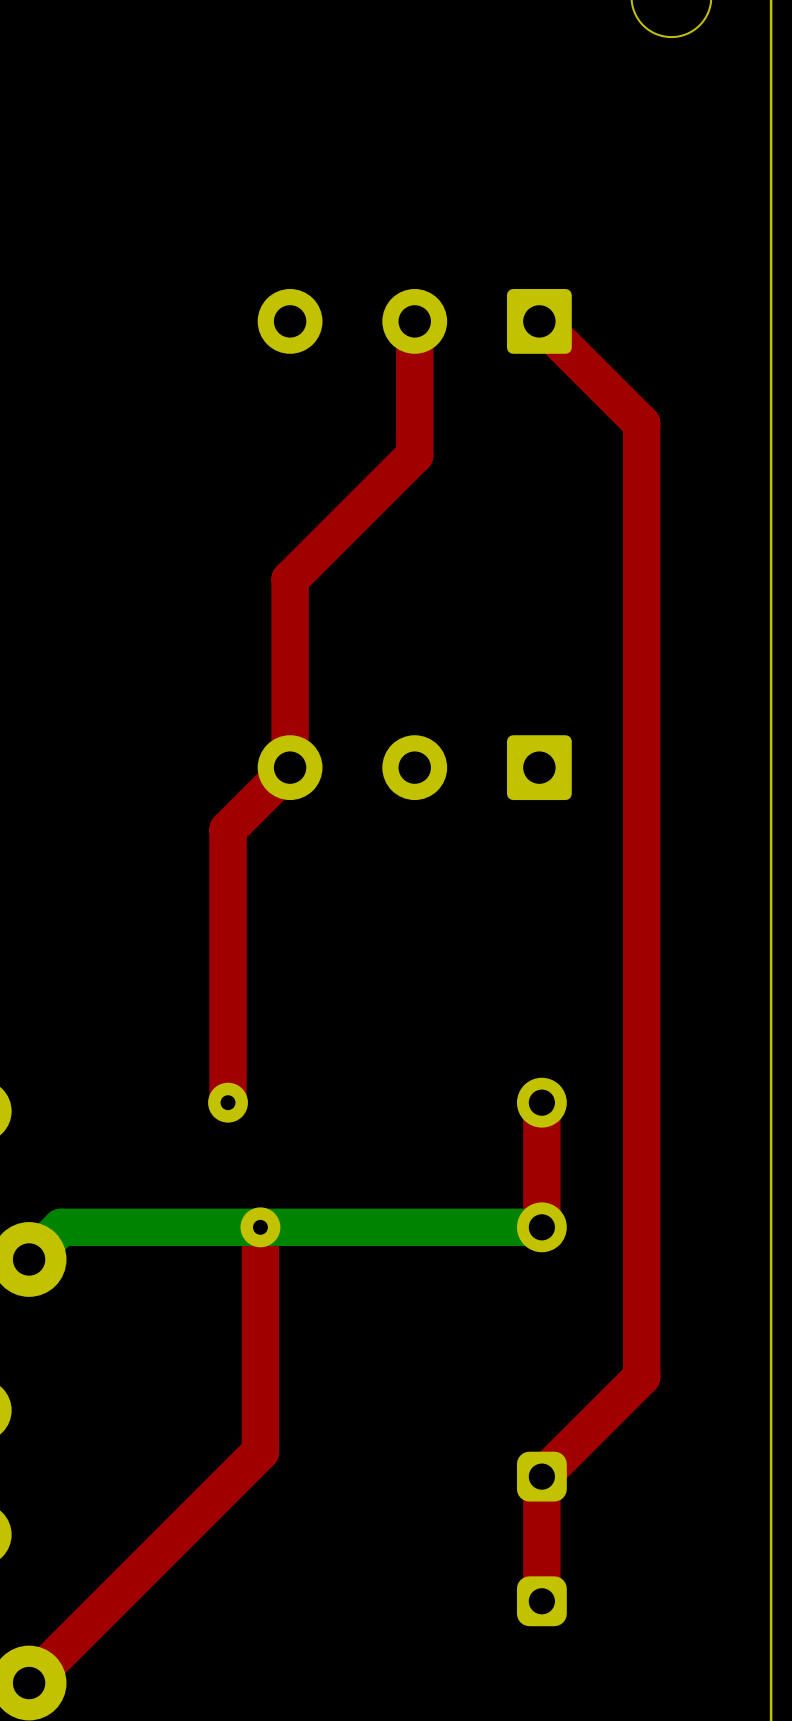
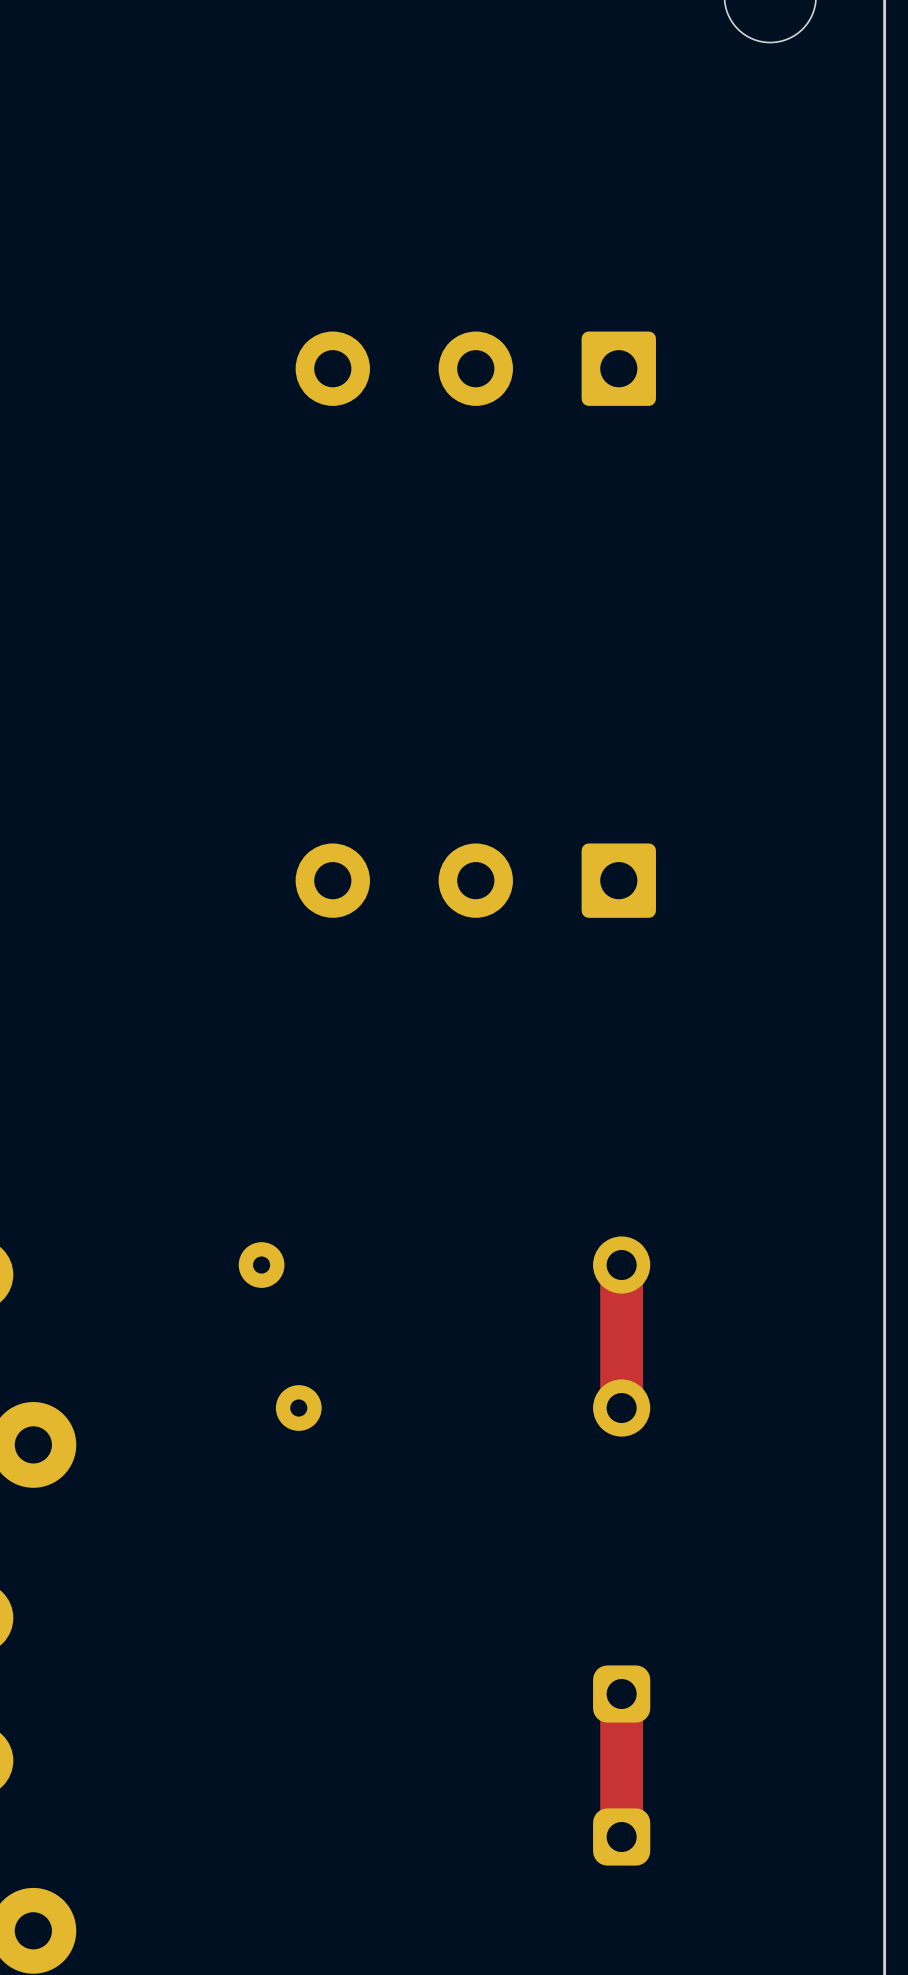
top track: (414, 321) (414, 454) (290, 579) (290, 767) (228, 829) (228, 1102) -> none
top track: (539, 321) (641, 423) (641, 1376) (541, 1476) -> none
top track: (260, 1227) (260, 1451) (29, 1683) -> none
bottom track: (541, 1227) (61, 1227) (29, 1259) -> none

